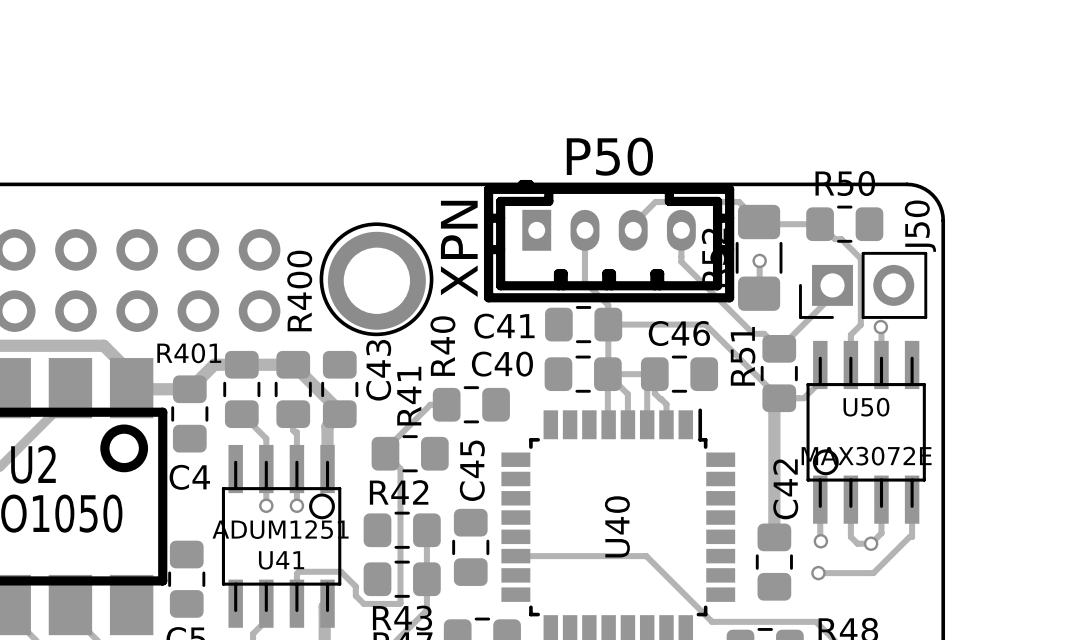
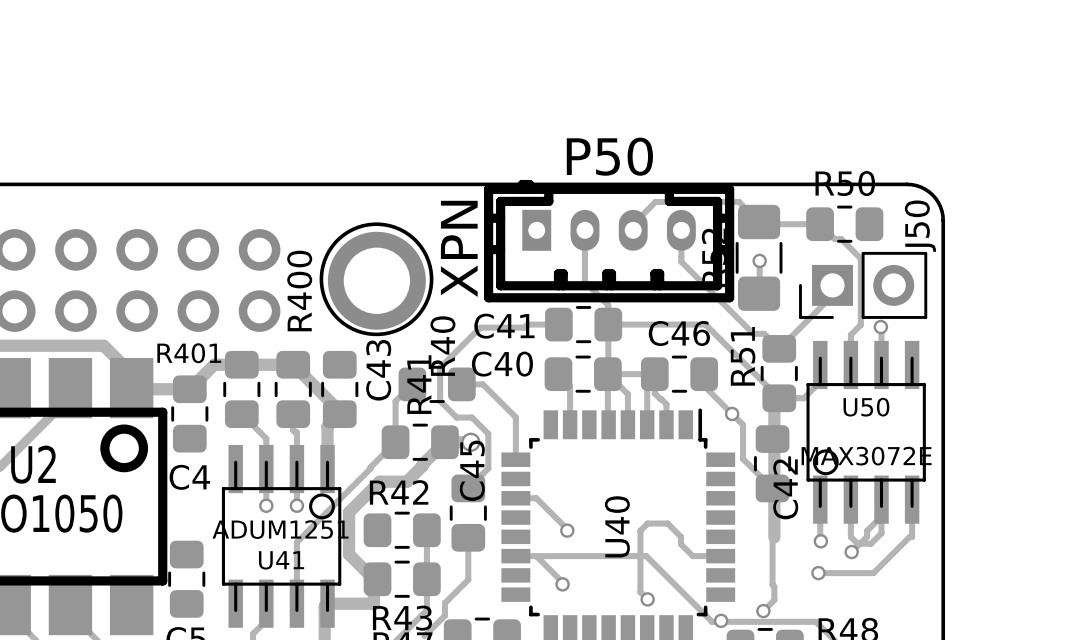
track: none -> (558, 324) (527, 324) (524, 327) (480, 327) (440, 367) (440, 400) (456, 417) (472, 417) (488, 433) (488, 468) (468, 488)
track: none -> (704, 374) (704, 386) (742, 424) (742, 458) (772, 488) (772, 584) (774, 586) (774, 600) (763, 611)
track: none -> (461, 384) (482, 384) (515, 417) (515, 459)
track: none -> (570, 385) (570, 424)
track: (446, 404) (430, 404) (385, 449) (385, 453) (400, 468) (400, 603) (363, 603) (355, 595) (355, 586) (341, 571) (298, 571) (296, 573) -> (412, 384) (395, 401) (395, 442) (296, 542) (296, 573)
R40 position: (471, 404) -> (437, 384)
via: none -> (732, 413)
track: none -> (470, 442) (444, 442) (406, 481) (379, 481) (349, 512) (349, 554) (373, 579) (373, 604) (327, 603)
via: none -> (470, 442)
R41 position: (410, 453) -> (420, 442)
track: none -> (515, 498) (536, 498) (567, 530)
track: none -> (881, 516) (867, 530) (867, 536) (851, 552)
via: none -> (567, 530)
track: none -> (468, 537) (468, 579) (444, 603) (444, 615) (424, 636)
via position: (871, 543) -> (851, 552)
C45 position: (470, 547) -> (468, 513)
track: none -> (536, 556) (562, 584)
track: none -> (720, 556) (692, 556) (680, 544) (680, 536) (667, 523) (647, 523) (640, 530) (640, 592) (647, 599)
C42 position: (774, 562) -> (772, 463)
via: none -> (562, 584)
via: none -> (647, 599)
via: none -> (763, 611)
via: none -> (721, 620)

